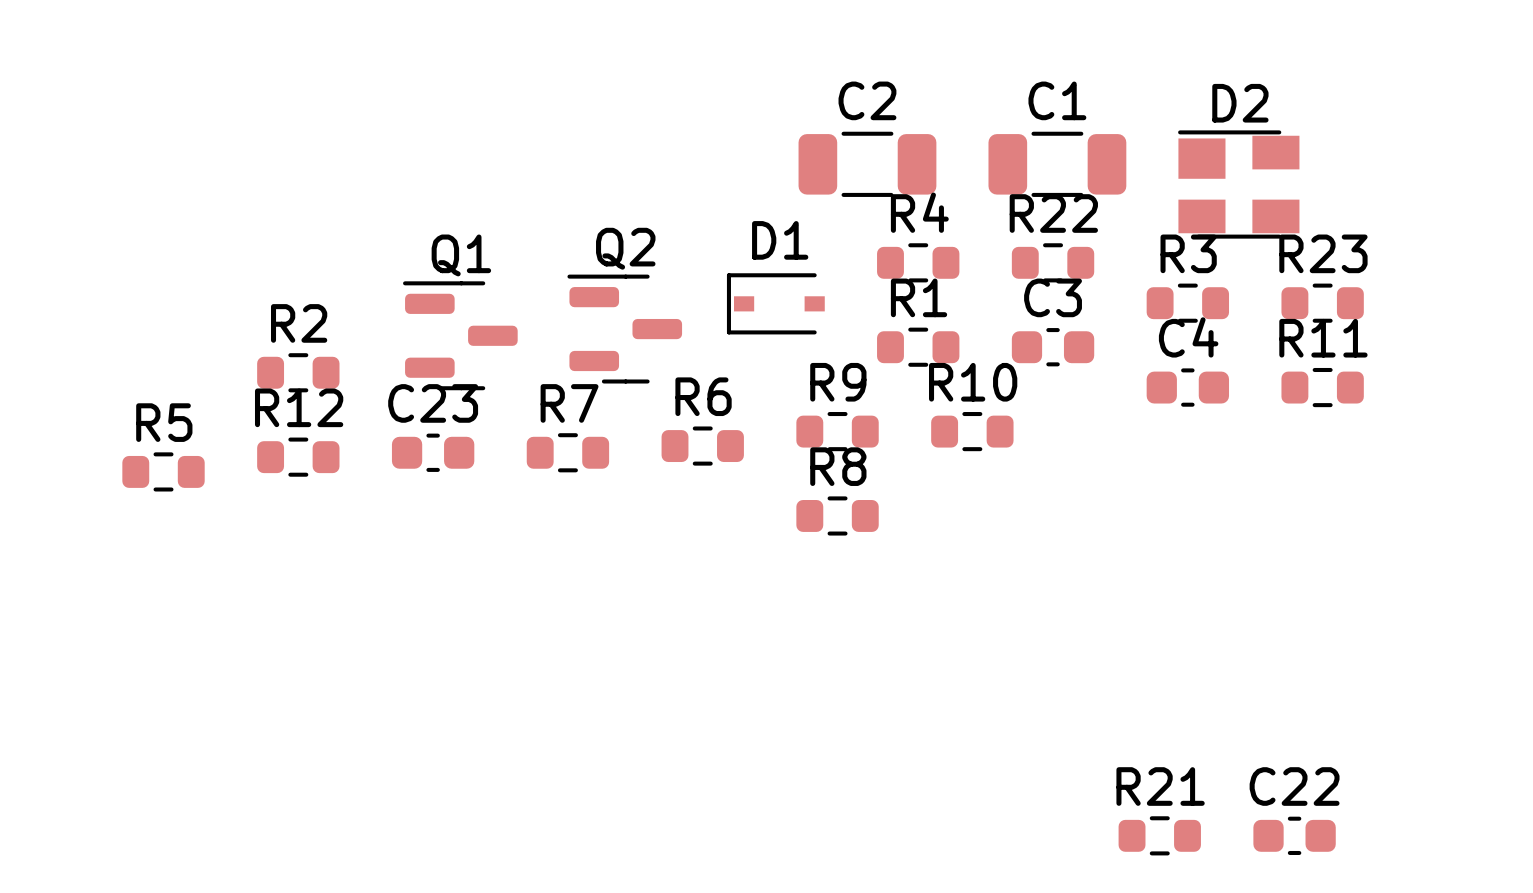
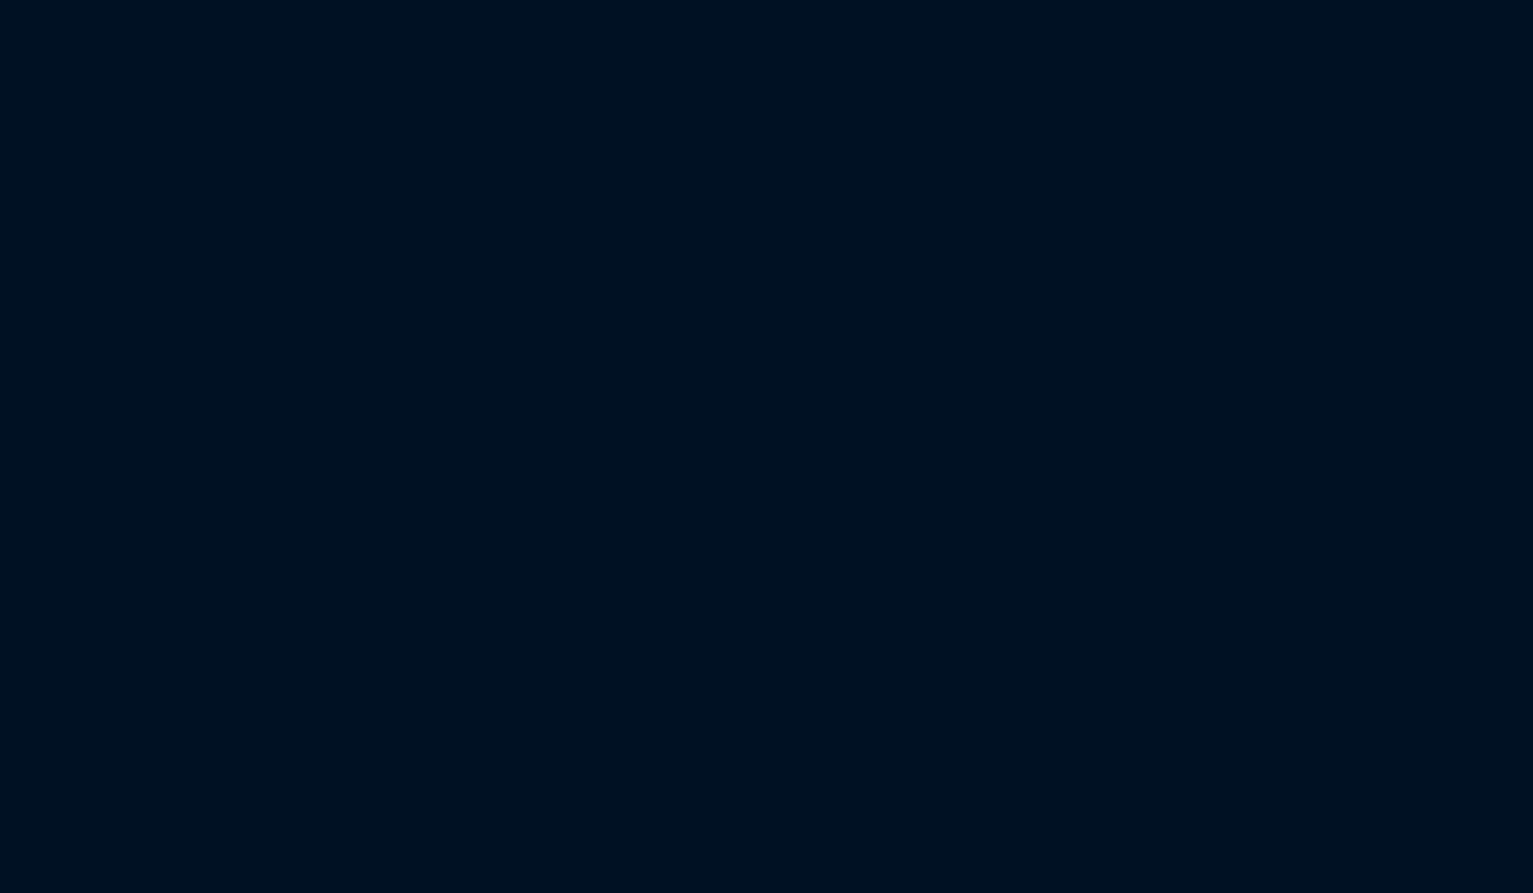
C2: (867, 164) -> none
C1: (1057, 164) -> none
D2: (1238, 184) -> none
R4: (918, 262) -> none
R22: (1053, 262) -> none
D1: (775, 303) -> none
R3: (1187, 303) -> none
R23: (1322, 303) -> none
Q2: (624, 329) -> none
Q1: (460, 335) -> none
R1: (918, 347) -> none
C3: (1053, 347) -> none
R2: (298, 372) -> none
C4: (1187, 387) -> none
R11: (1322, 387) -> none
R9: (837, 431) -> none
R10: (972, 431) -> none
R6: (702, 446) -> none
C23: (433, 452) -> none
R7: (567, 452) -> none
R12: (298, 457) -> none
R5: (163, 471) -> none
R8: (837, 515) -> none
R21: (1159, 835) -> none
C22: (1294, 835) -> none

